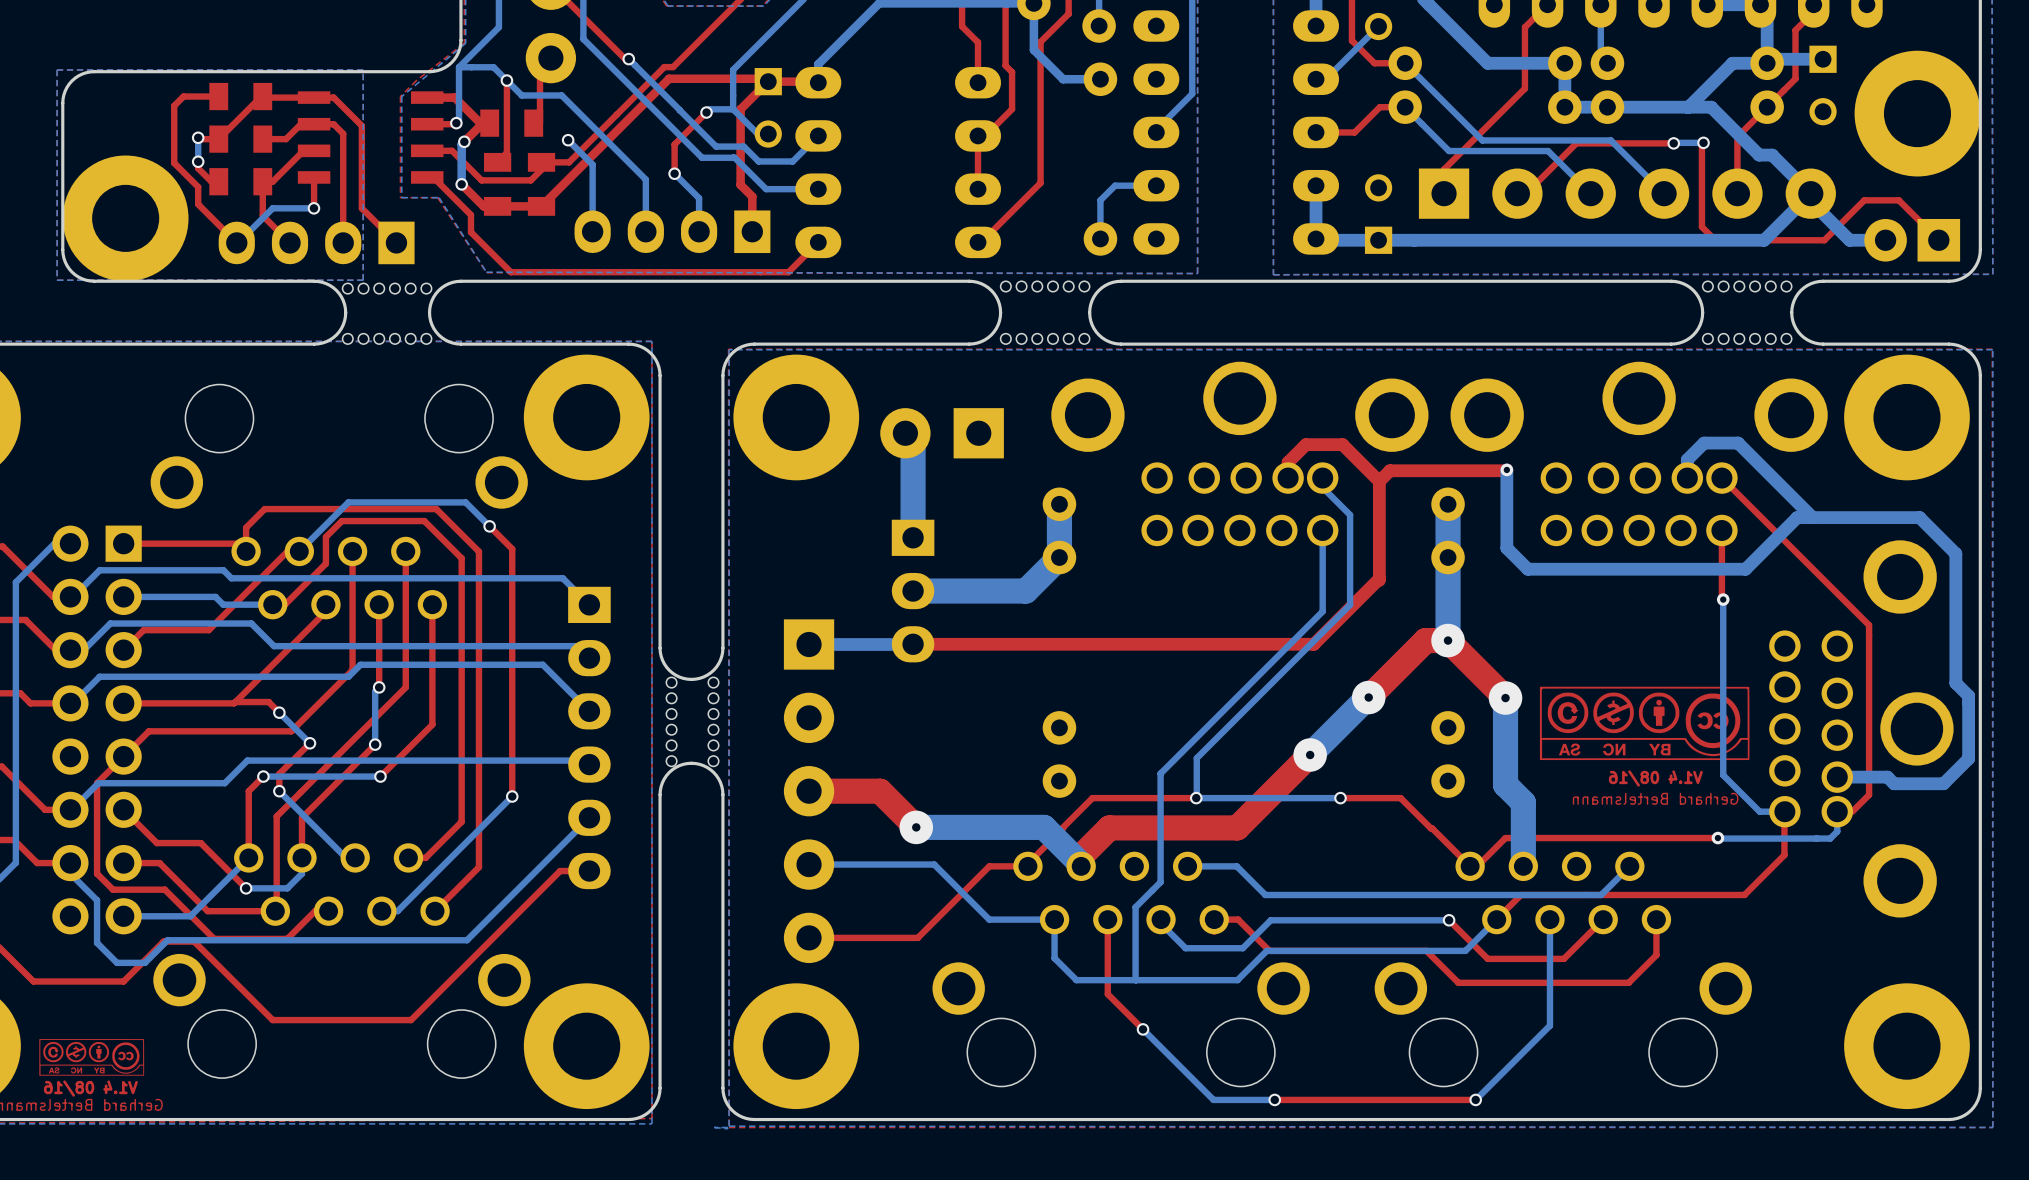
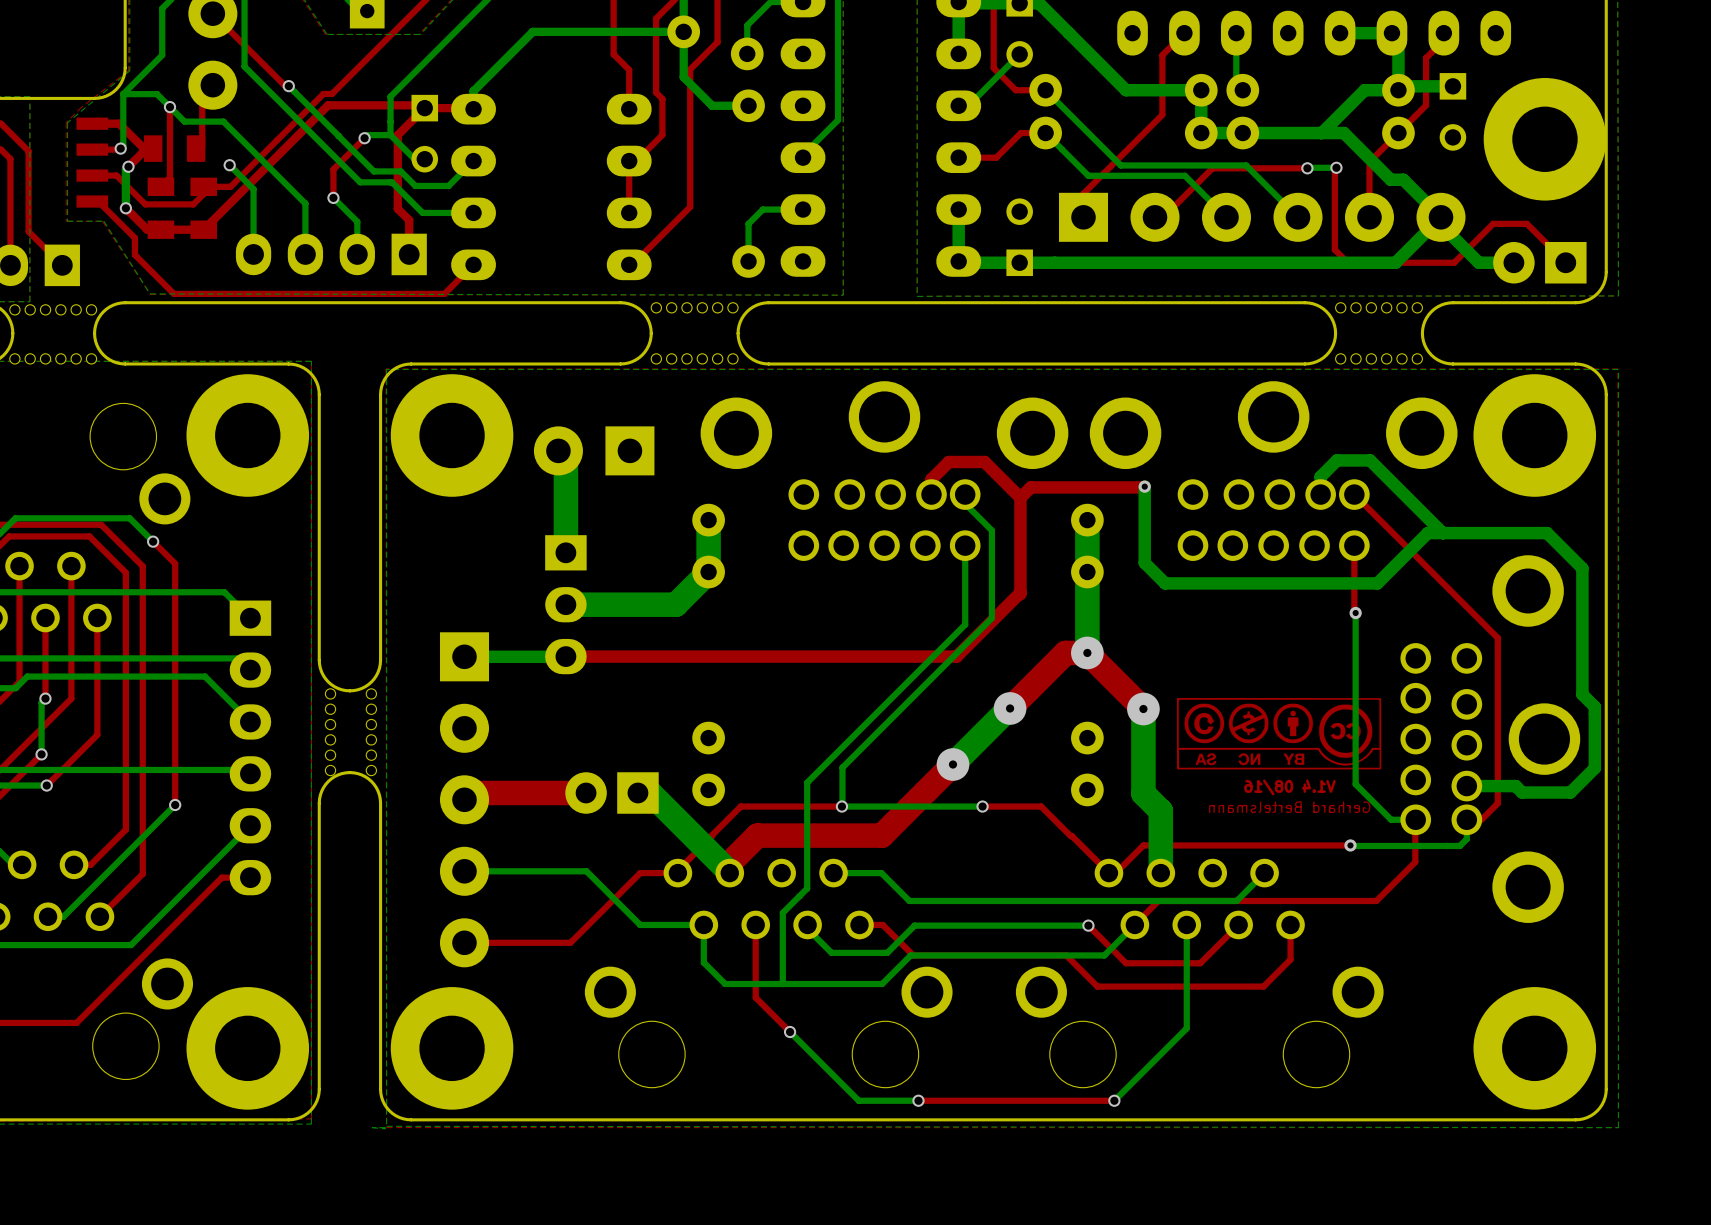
part: none -> (612, 793)
bottom track: none -> (637, 793) (650, 793) (729, 872)
top track: (809, 791) (880, 791) (916, 827) -> (464, 799) (471, 793) (586, 793)
bottom track: (916, 827) (1044, 827) (1081, 864) -> none
via: (916, 827) -> none

